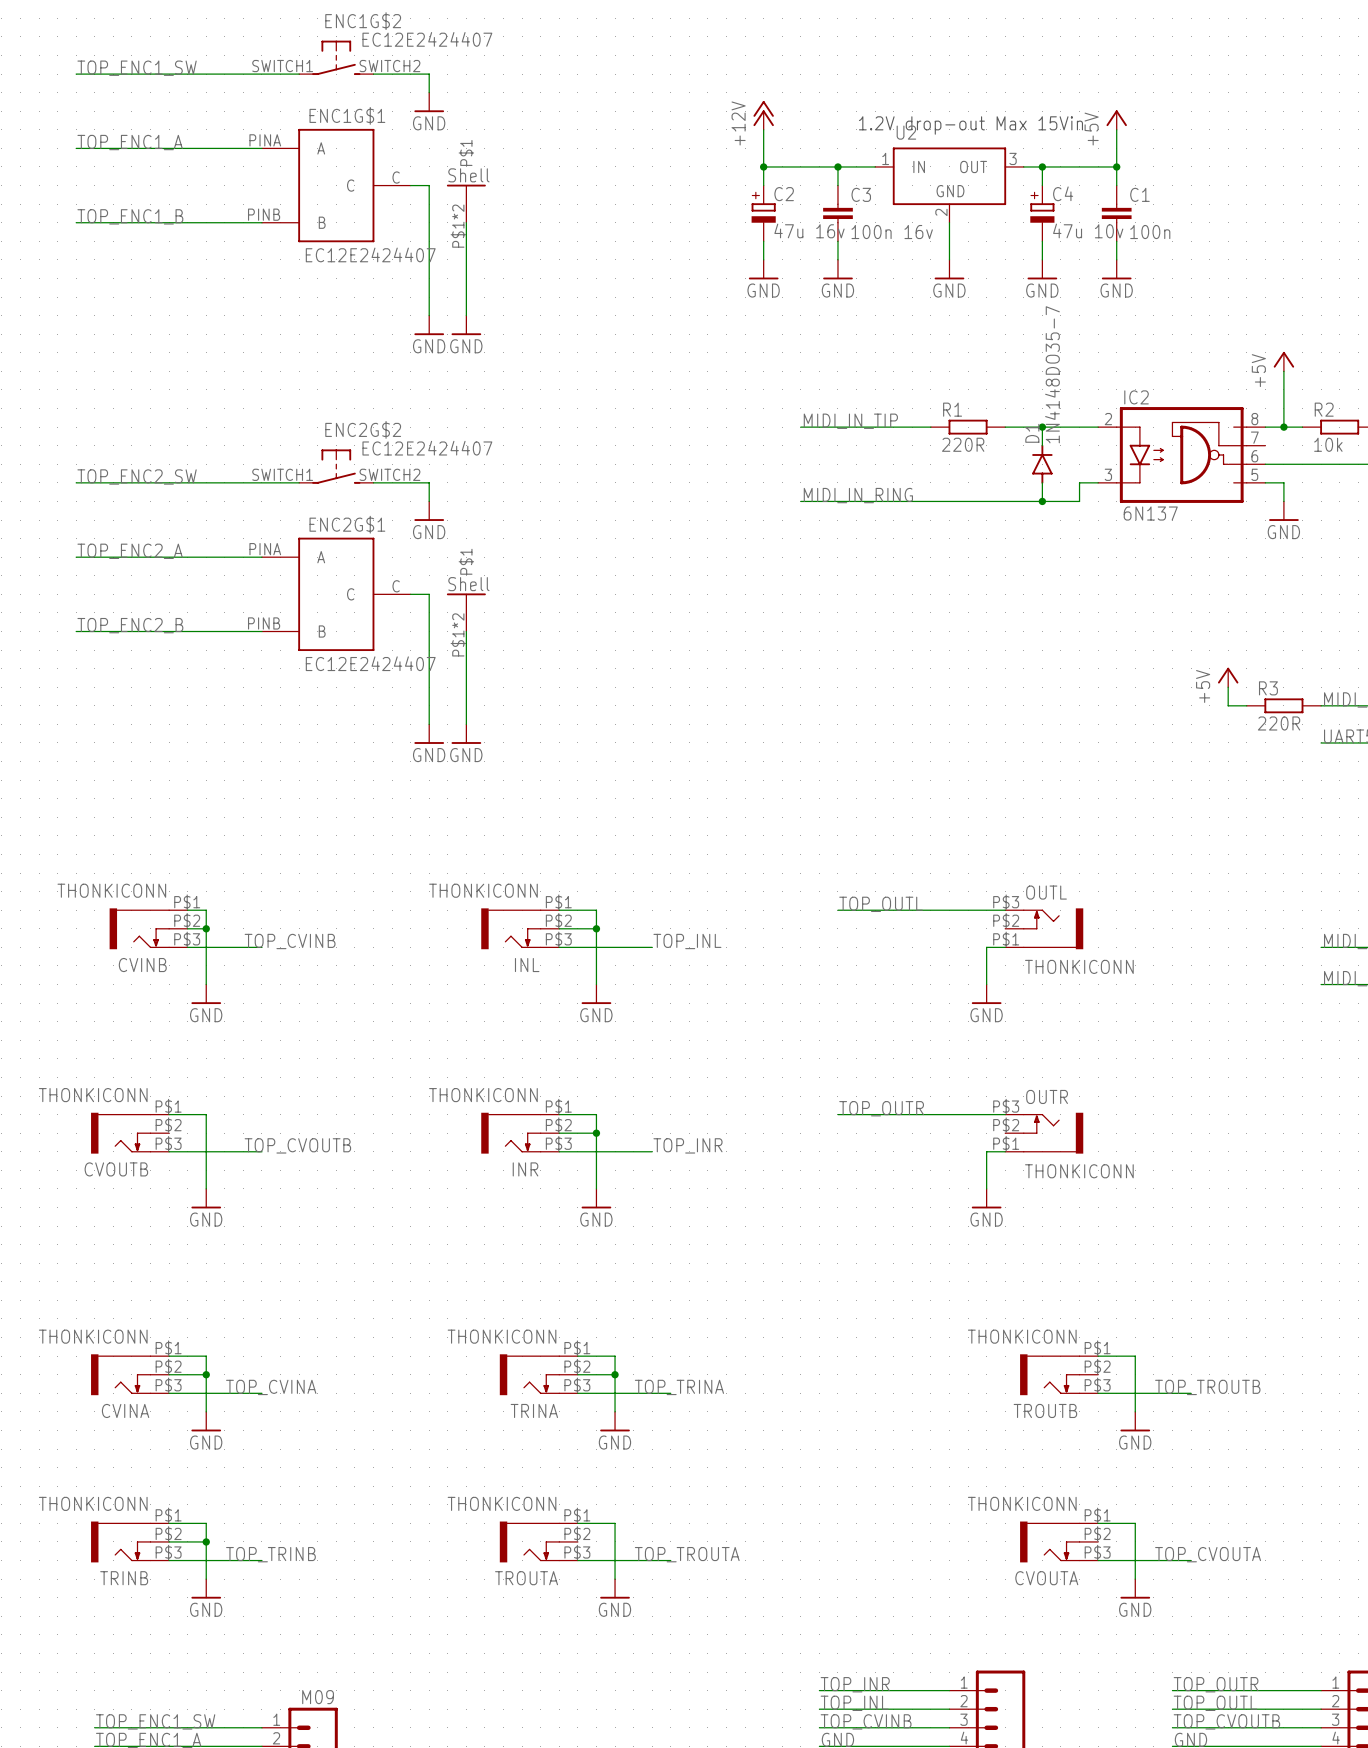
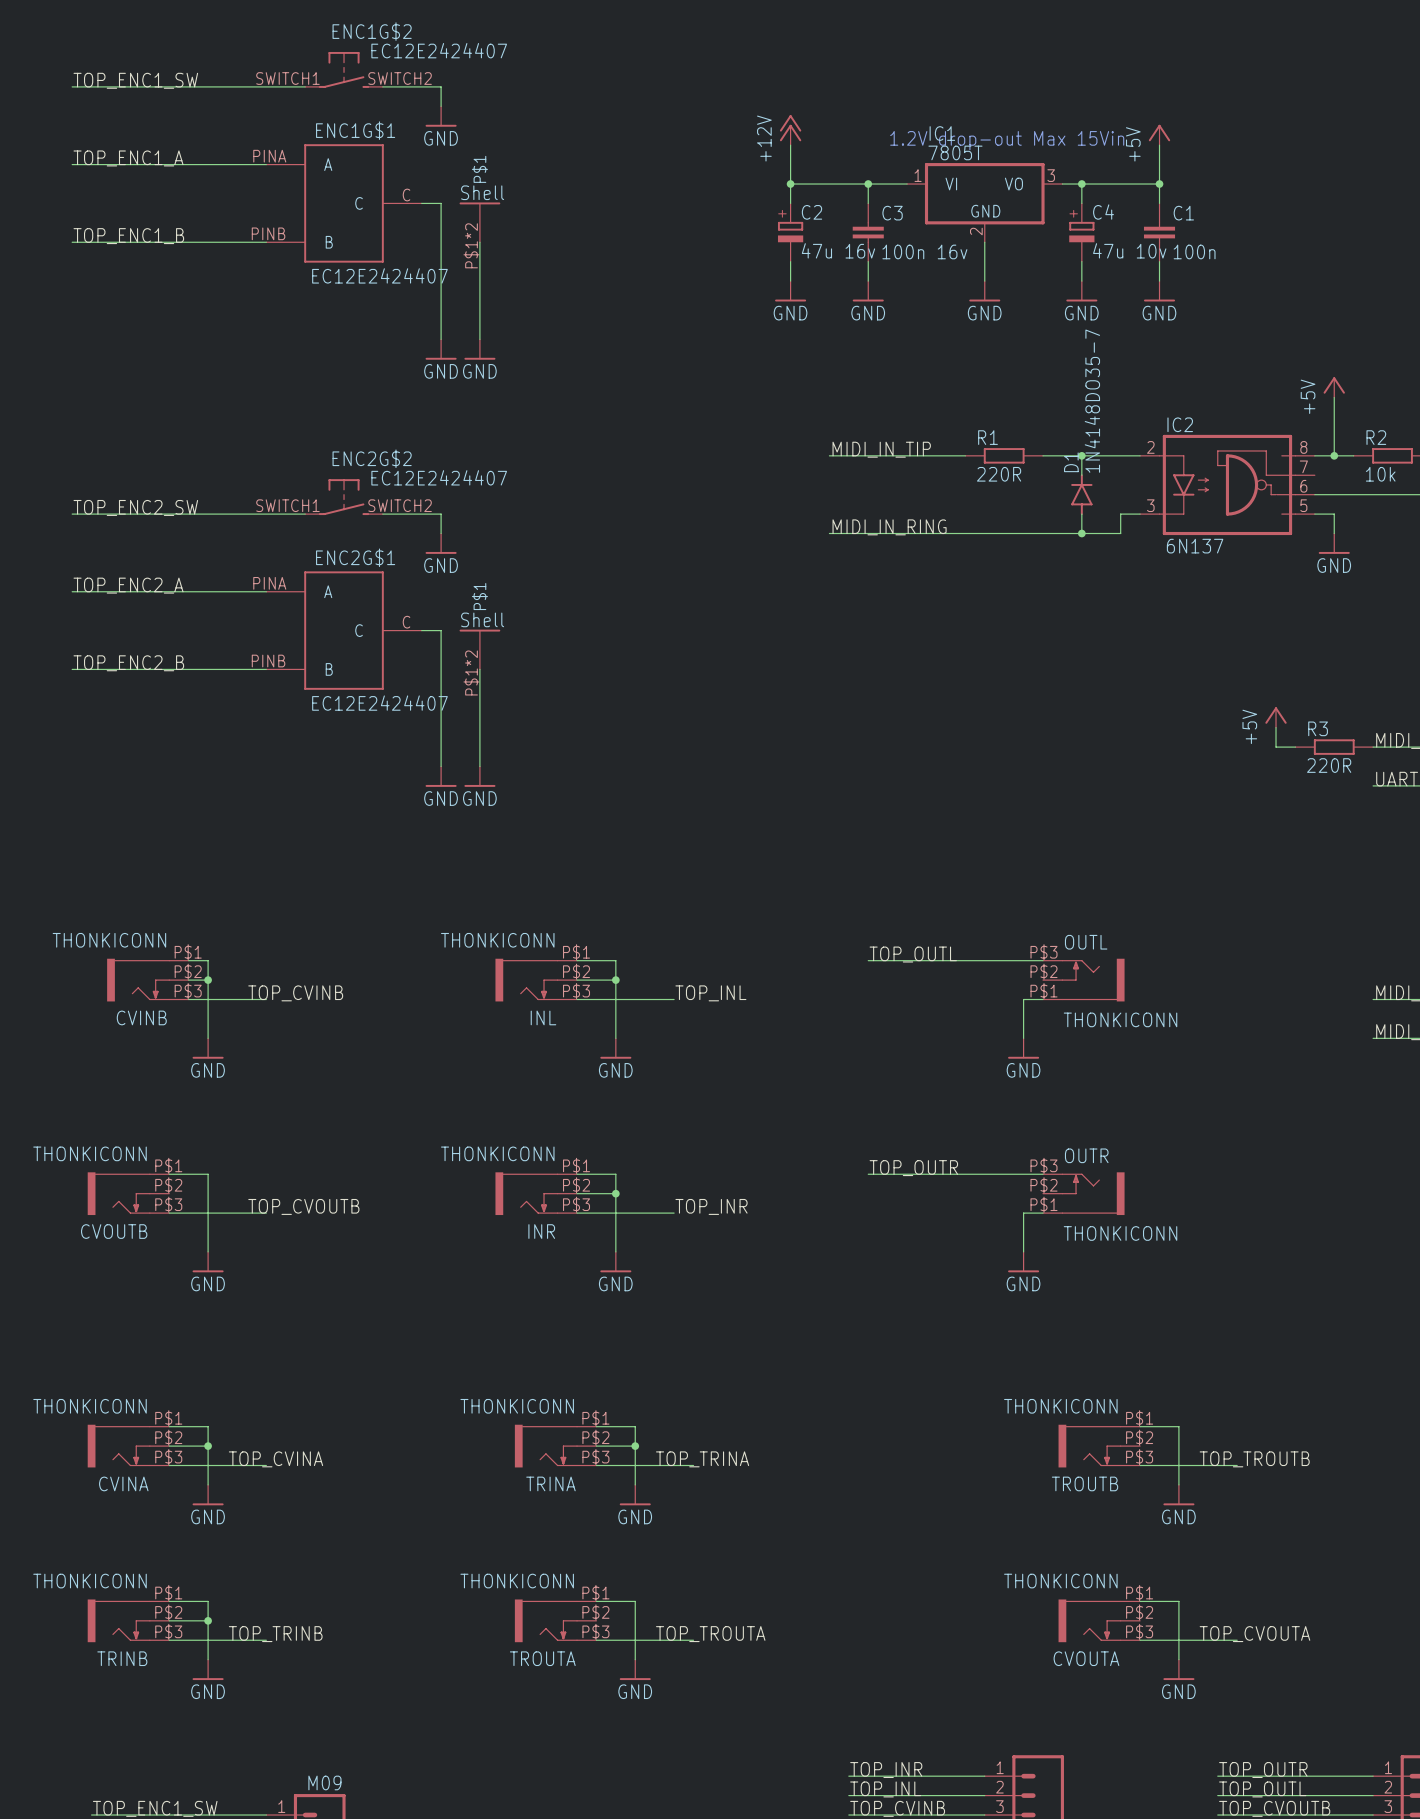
IC1: none -> 7805T (984, 202)
U2: (949, 185) -> none

